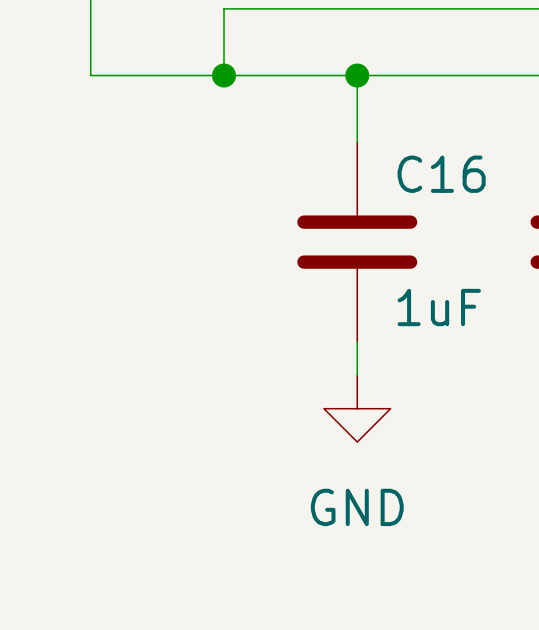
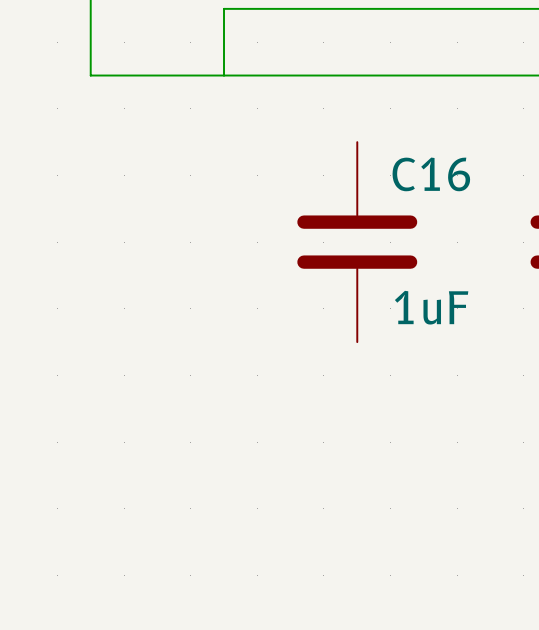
junction: (224, 75) -> none
wire: (357, 75) (357, 142) -> none
junction: (357, 75) -> none
wire: (357, 342) (357, 375) -> none
power symbol: GND (357, 408) -> none

